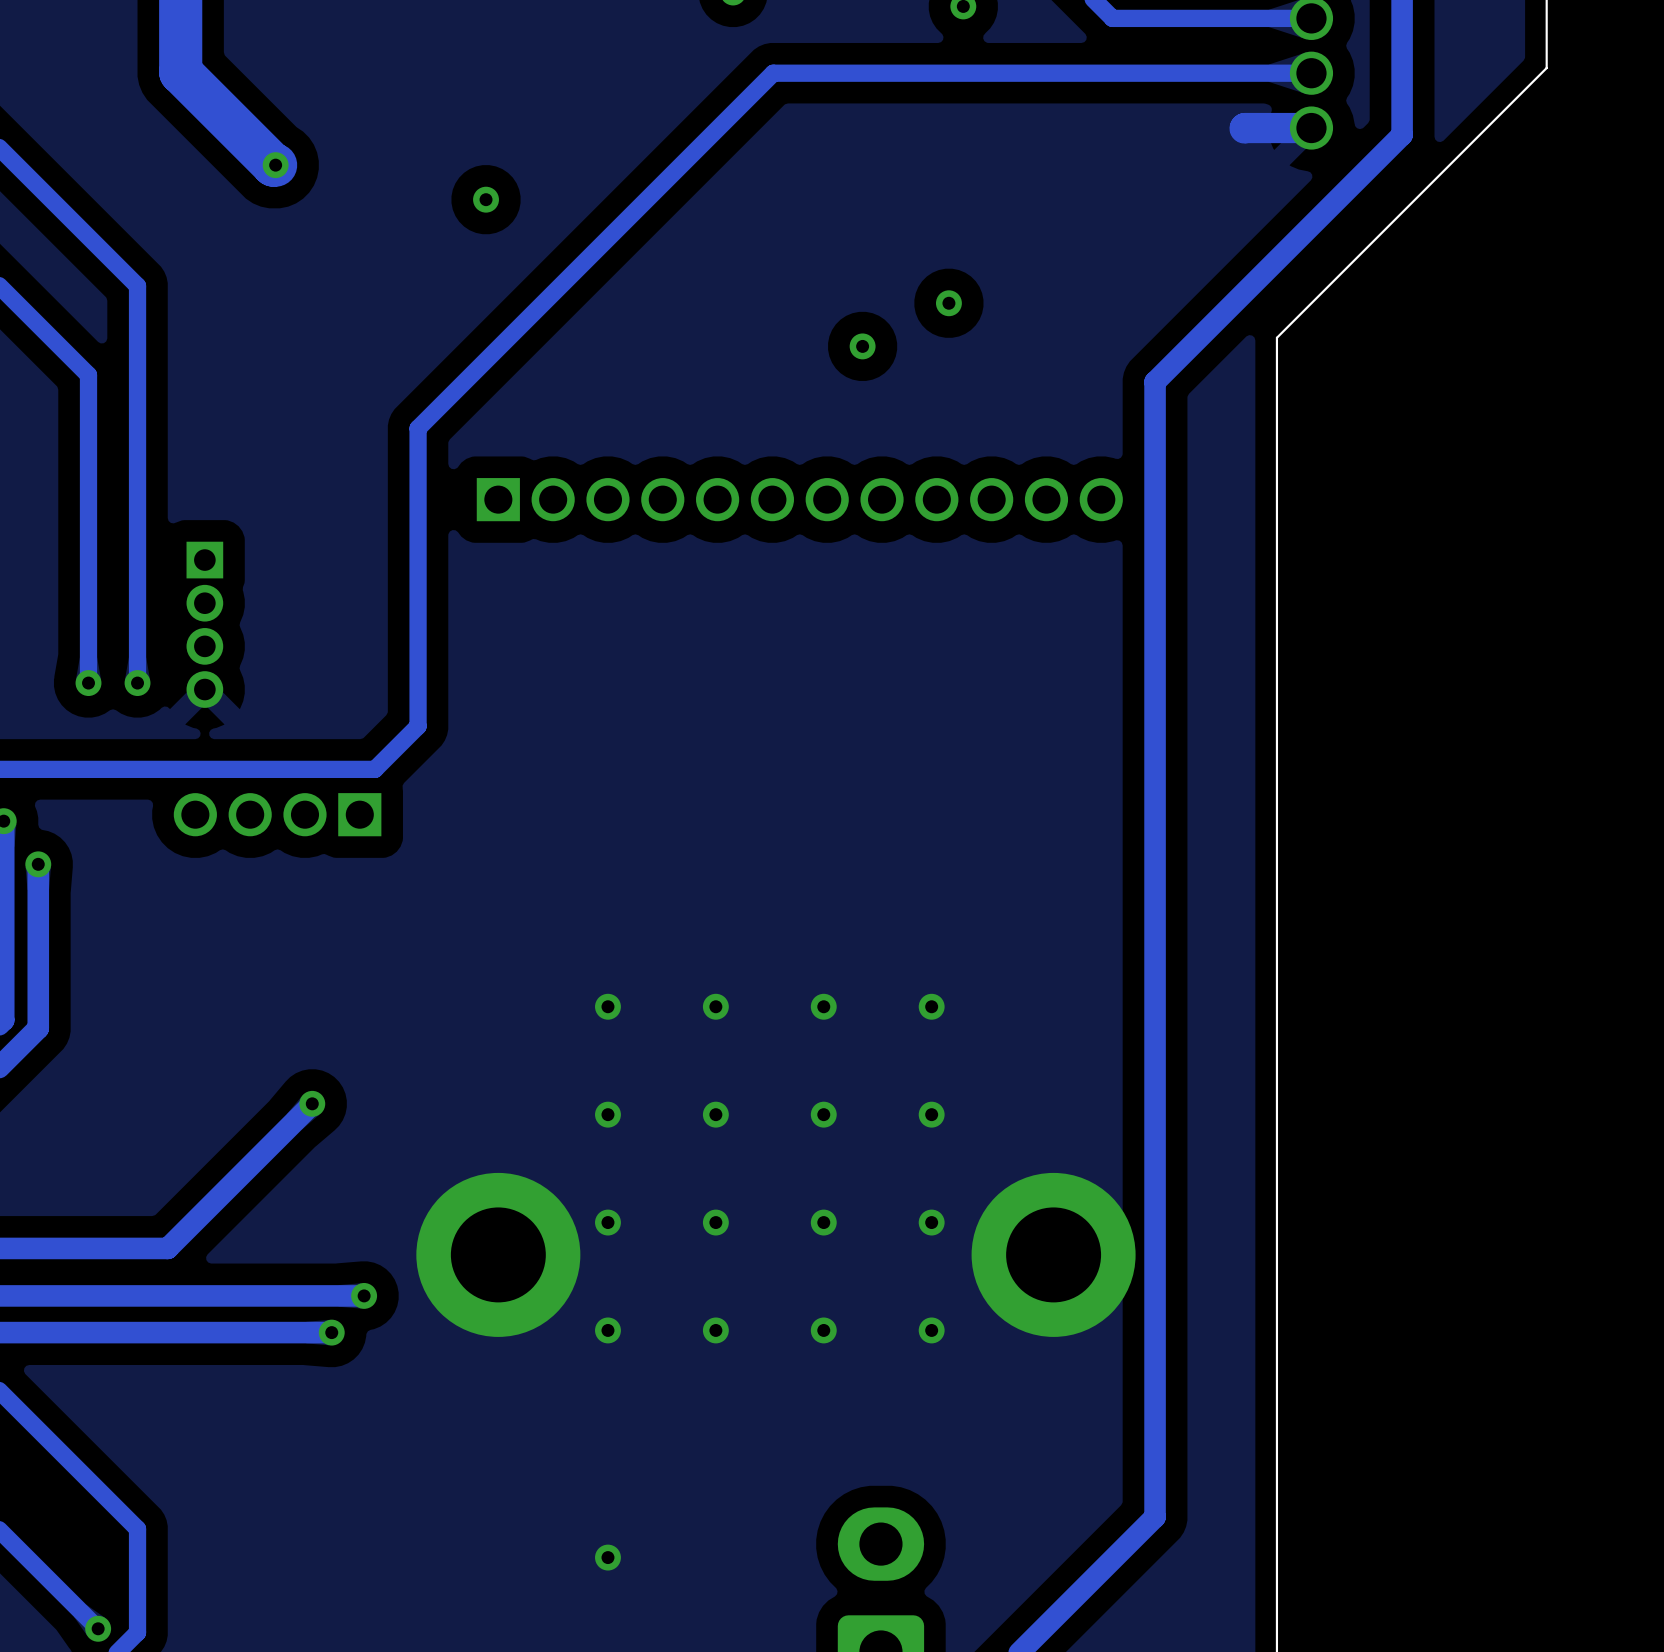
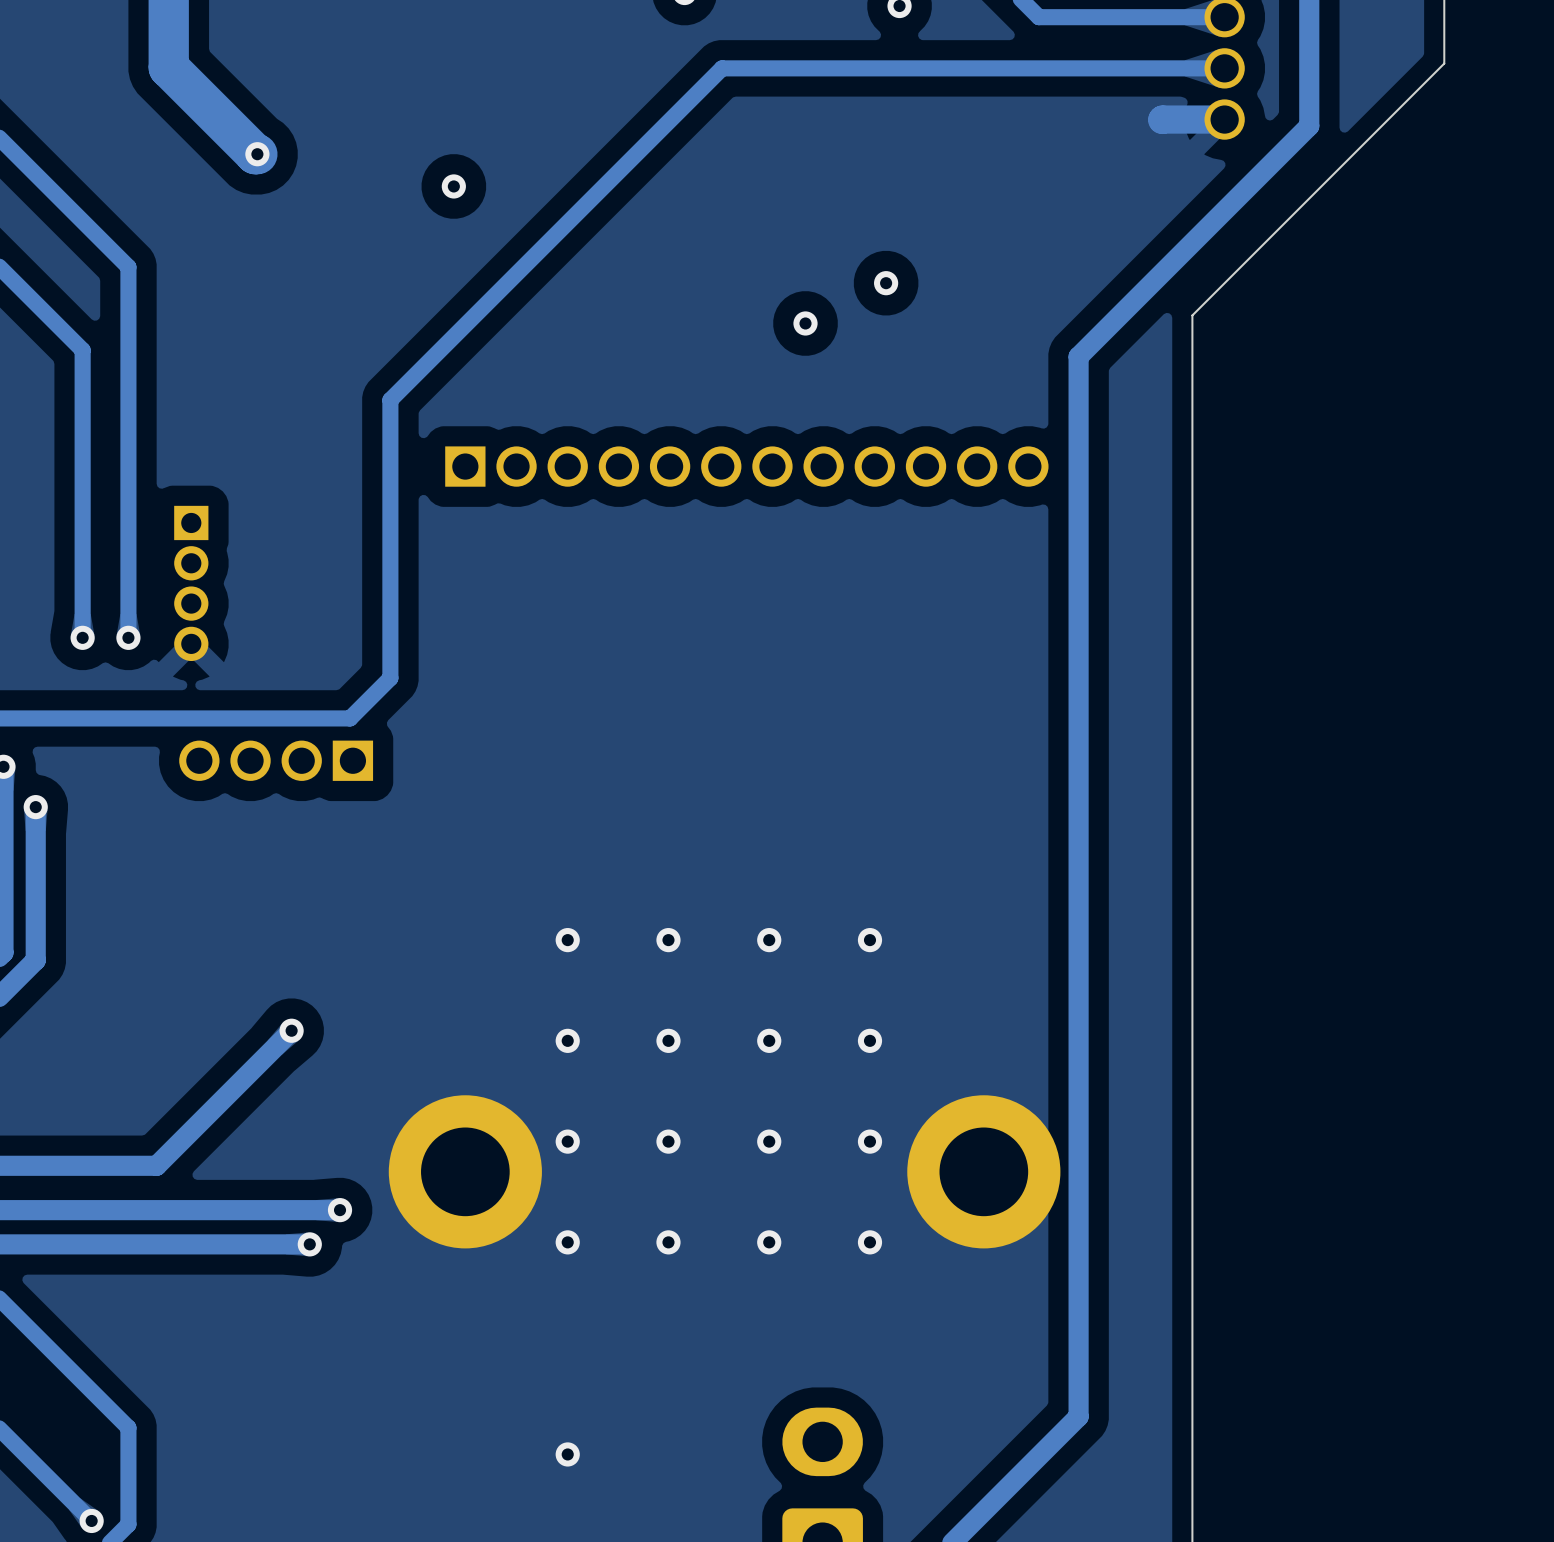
part position: (277, 814) -> (276, 760)

